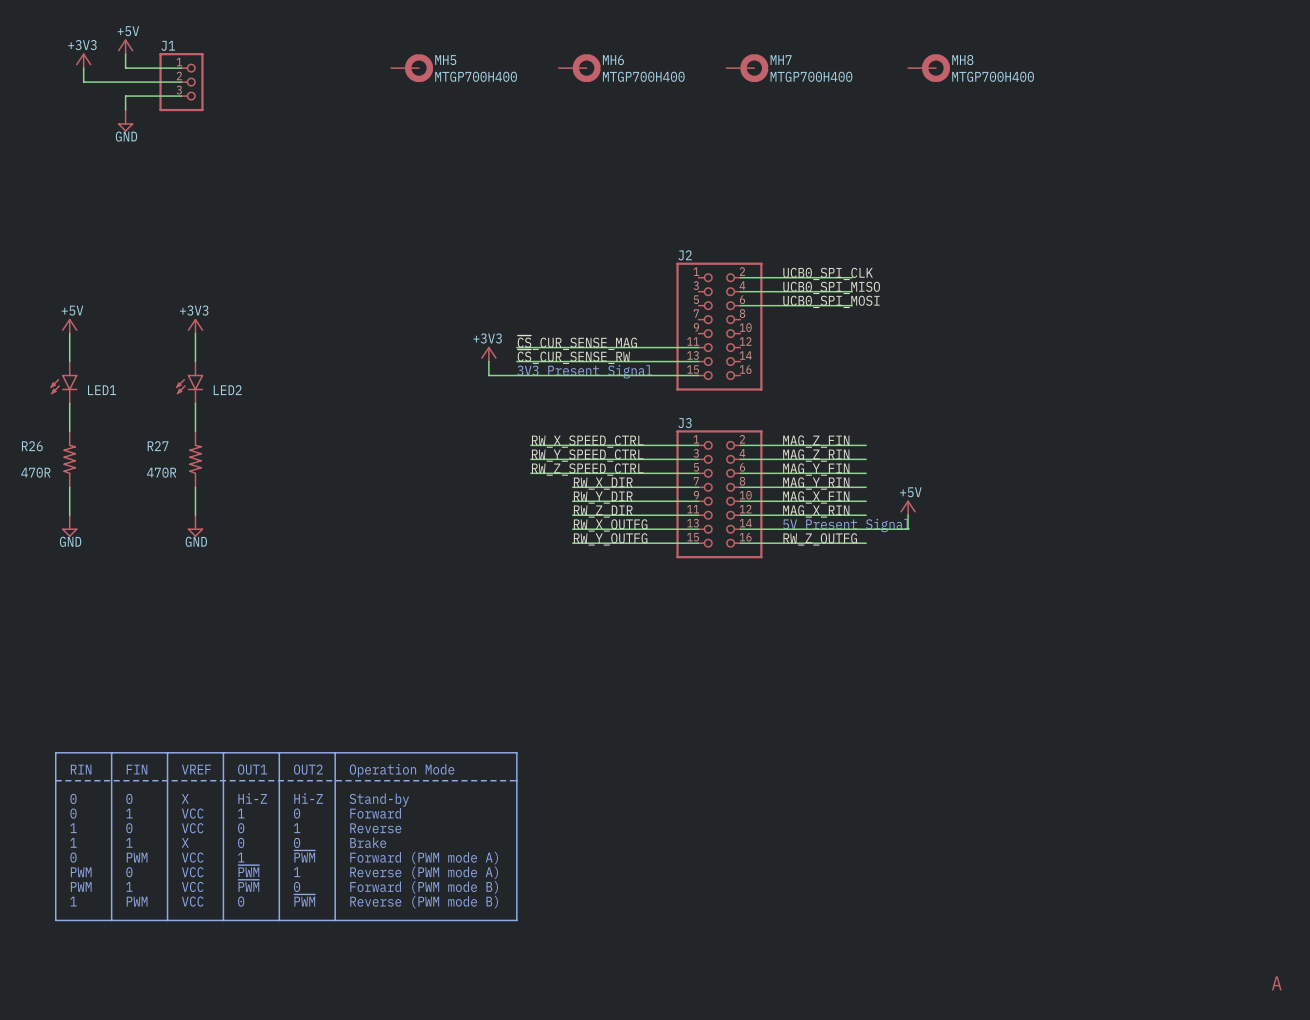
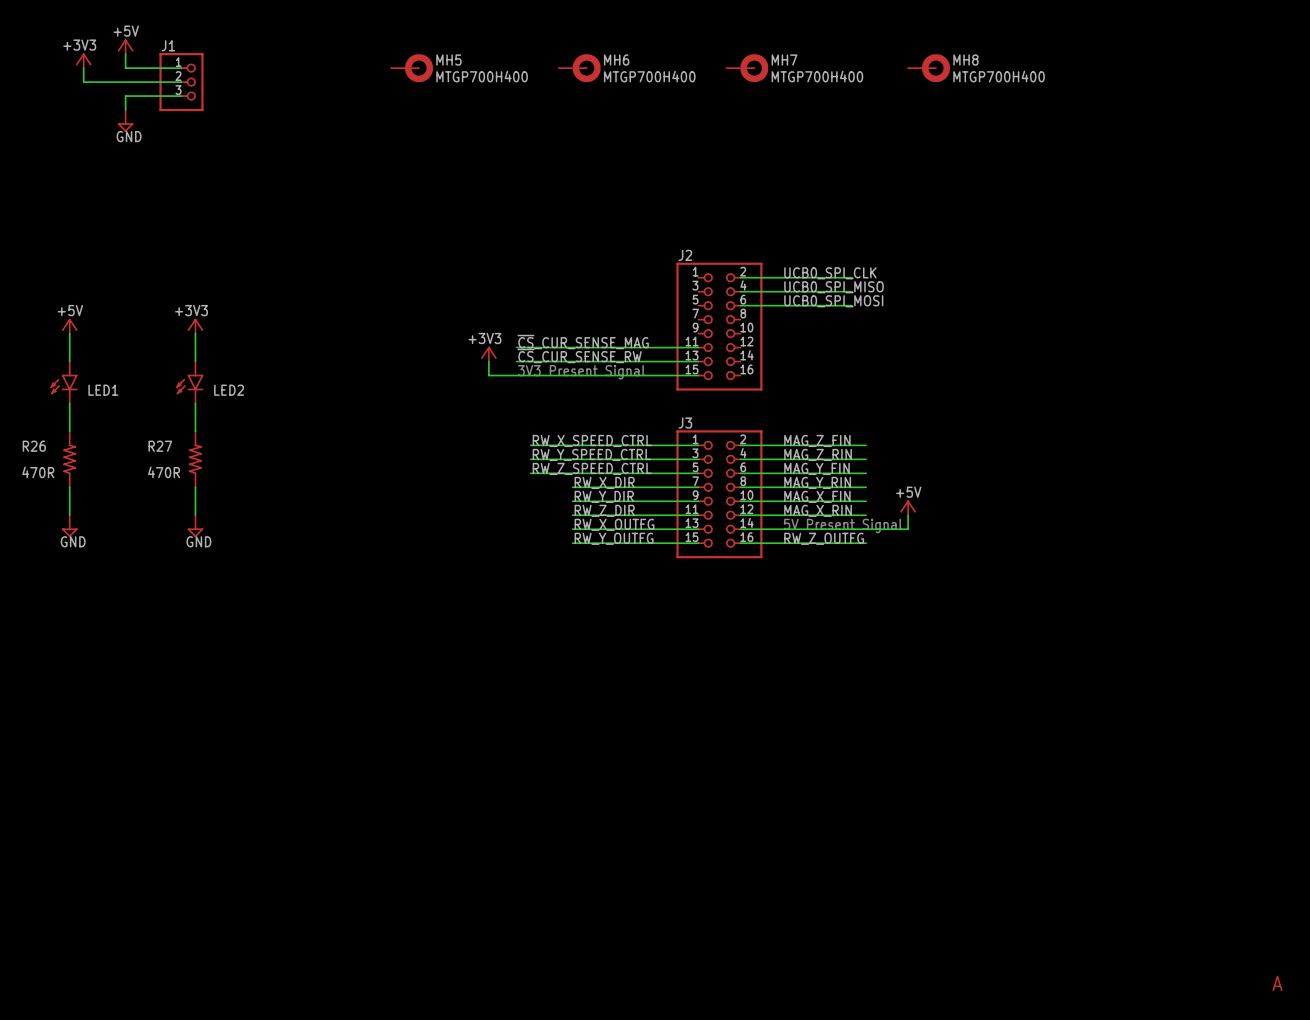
line: (55, 752) (516, 752) (516, 920) (55, 920) (55, 752) -> none
line: (111, 752) (111, 920) -> none
line: (167, 752) (167, 920) -> none
line: (223, 752) (223, 920) -> none
line: (279, 752) (279, 920) -> none
line: (335, 752) (335, 920) -> none
text: RIN (81, 769) -> none
text: FIN (137, 769) -> none
text: VREF (196, 769) -> none
text: OUT1 (252, 769) -> none
text: OUT2 (308, 769) -> none
text: Operation Mode (402, 770) -> none
line: (55, 780) (516, 780) -> none
text: 0 (73, 798) -> none
text: 0 (129, 798) -> none
text: X (185, 798) -> none
text: Hi-Z (252, 798) -> none
text: Hi-Z (308, 798) -> none
text: Stand-by (379, 800) -> none
text: 0 (73, 813) -> none
text: 1 (129, 813) -> none
text: VCC (192, 813) -> none
text: 1 (241, 813) -> none
text: 0 (297, 813) -> none
text: Forward (375, 813) -> none
text: 1 (73, 828) -> none
text: 0 (129, 828) -> none
text: VCC (192, 828) -> none
text: 0 (241, 828) -> none
text: 1 (297, 828) -> none
text: Reverse (375, 828) -> none
text: 1 (73, 842) -> none
text: 1 (129, 842) -> none
text: X (185, 842) -> none
text: 0 (241, 842) -> none
text: 0 (297, 842) -> none
text: Brake (368, 842) -> none
text: ~{PWM} (304, 856) -> none
text: 0 (73, 857) -> none
text: PWM (137, 857) -> none
text: VCC (192, 857) -> none
text: 1 (241, 857) -> none
text: Forward (PWM mode A) (424, 858) -> none
text: ~{PWM} (248, 871) -> none
text: PWM (81, 872) -> none
text: 0 (129, 872) -> none
text: VCC (192, 872) -> none
text: 1 (297, 872) -> none
text: Reverse (PWM mode A) (424, 872) -> none
text: ~{PWM} (248, 885) -> none
text: PWM (81, 886) -> none
text: 1 (129, 886) -> none
text: VCC (192, 886) -> none
text: 0 (297, 886) -> none
text: Forward (PWM mode B) (424, 887) -> none
text: ~{PWM} (304, 900) -> none
text: 1 (73, 901) -> none
text: PWM (137, 901) -> none
text: VCC (192, 901) -> none
text: 0 (241, 901) -> none
text: Reverse (PWM mode B) (424, 902) -> none

